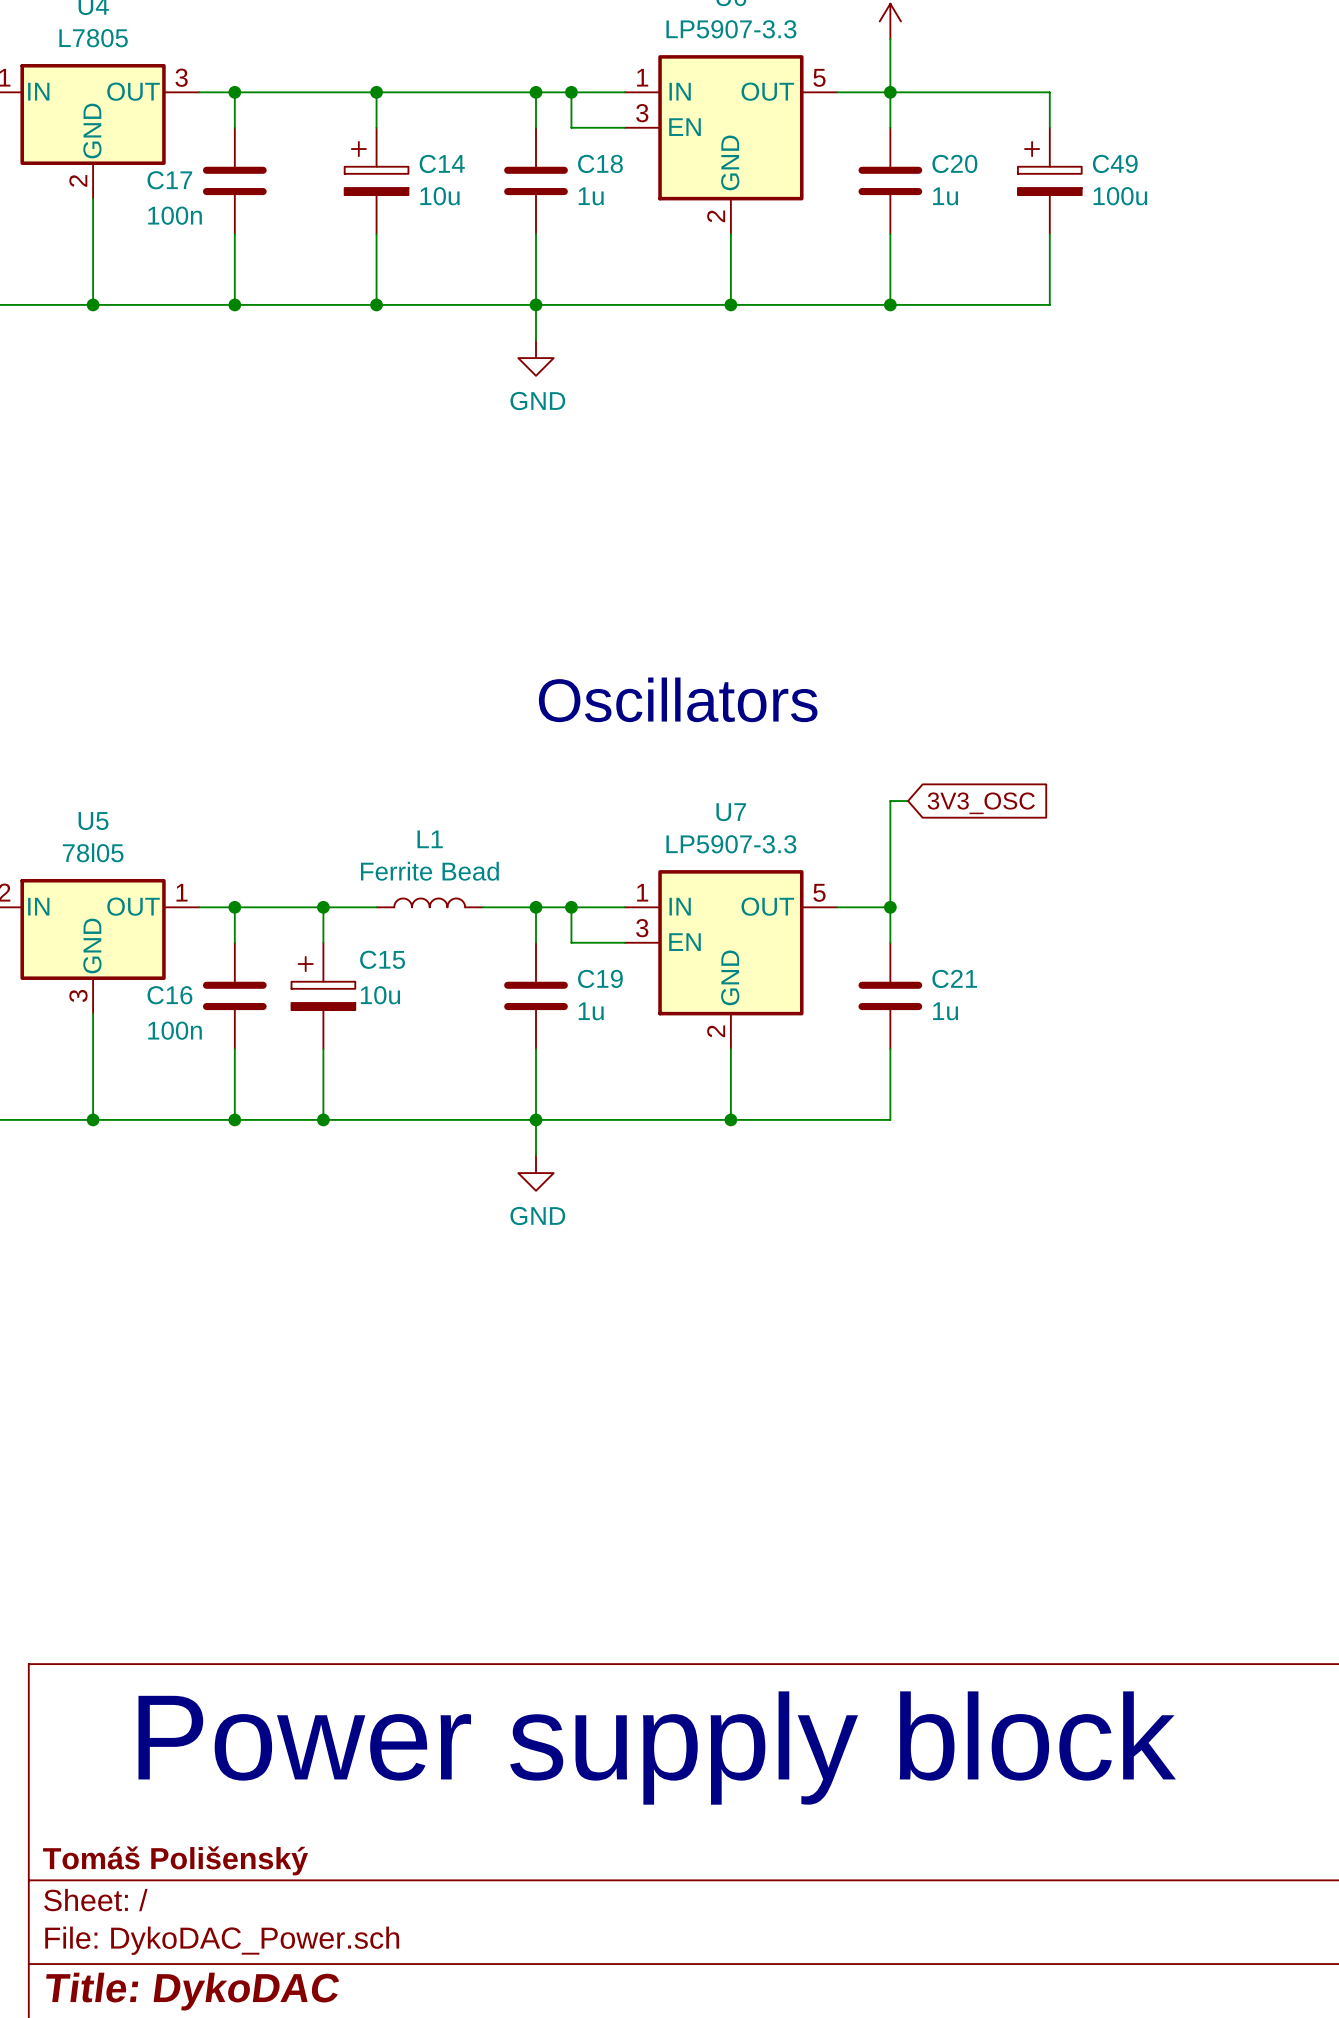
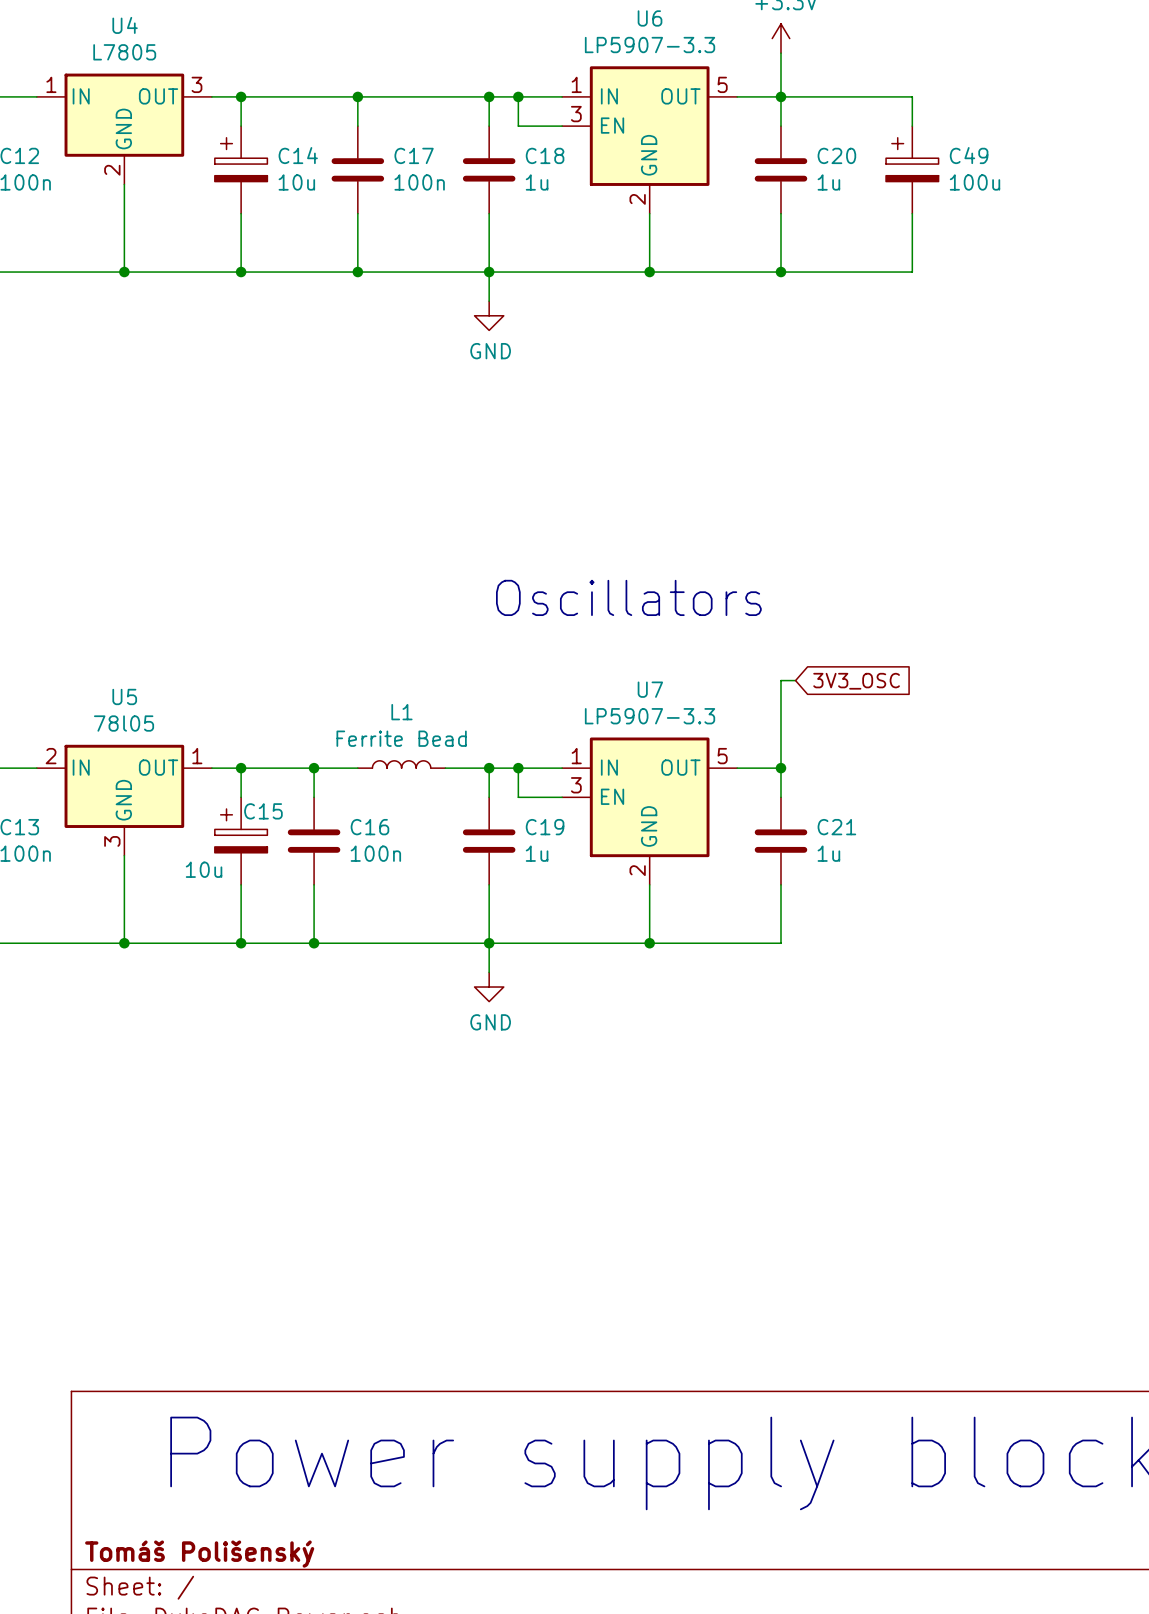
C17 name position: C17 (169, 180) -> C17 (414, 155)
C17 position: (234, 180) -> (357, 169)
C14 position: (376, 180) -> (241, 169)
C17 value position: 100n (175, 215) -> 100n (419, 182)
C15 name position: C15 (382, 959) -> C15 (263, 811)
C16 name position: C16 (169, 995) -> C16 (369, 827)
C16 position: (234, 995) -> (314, 841)
C15 position: (323, 995) -> (241, 841)
C15 value position: 10u (380, 995) -> 10u (204, 869)
C16 value position: 100n (175, 1030) -> 100n (375, 853)

